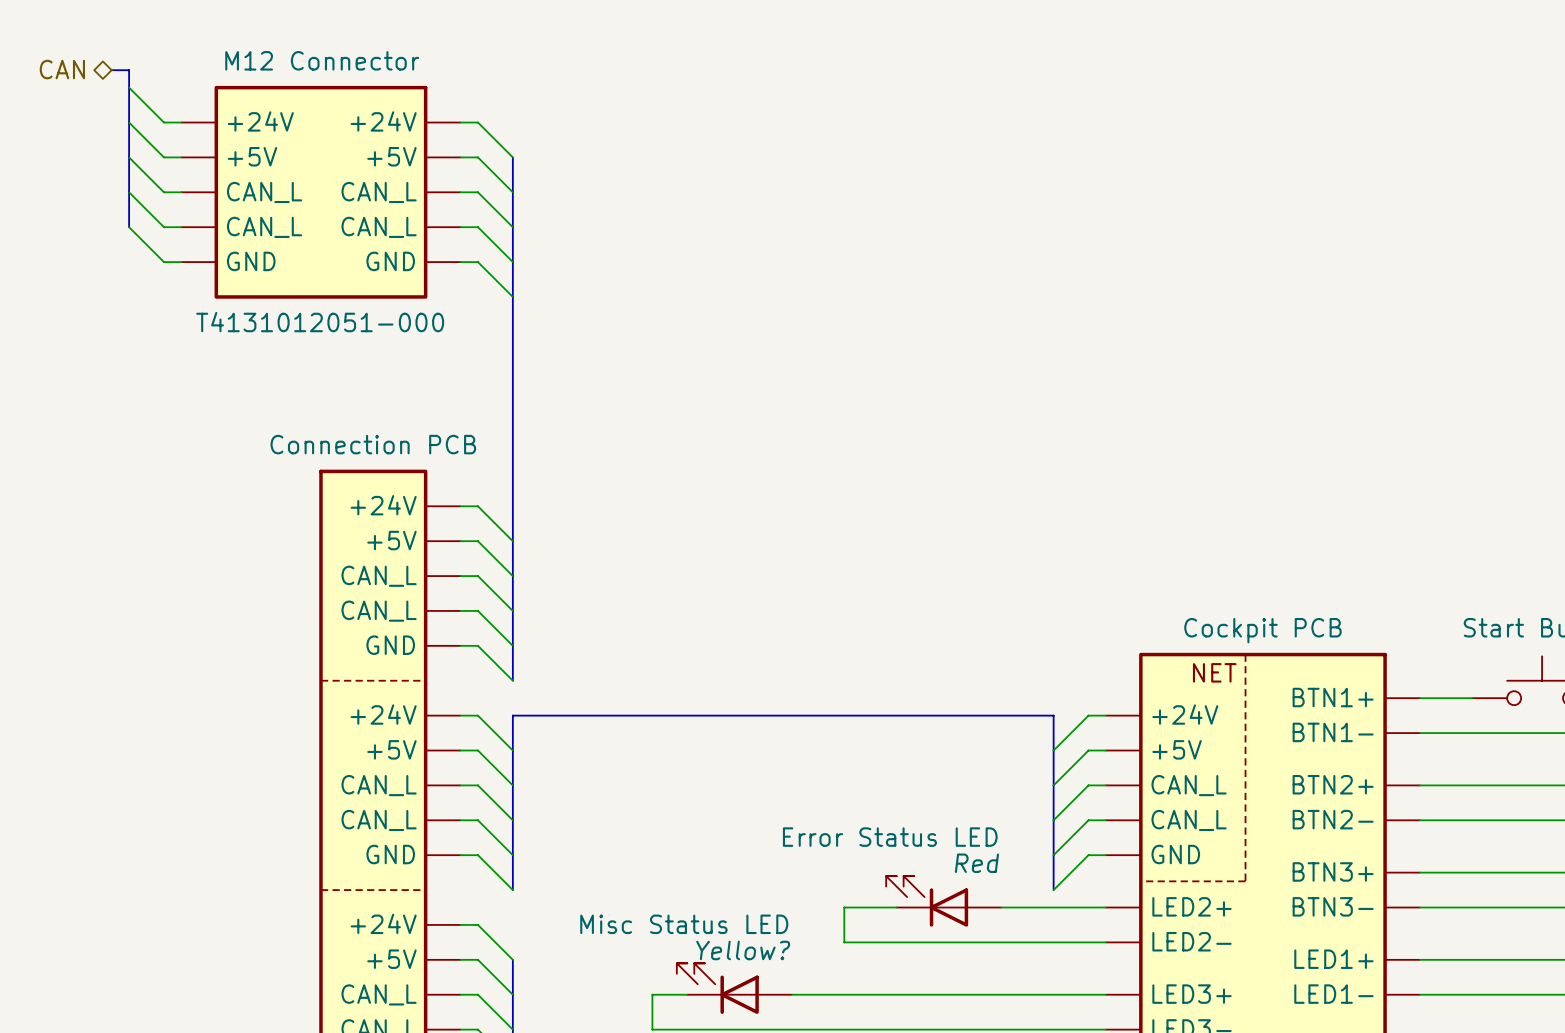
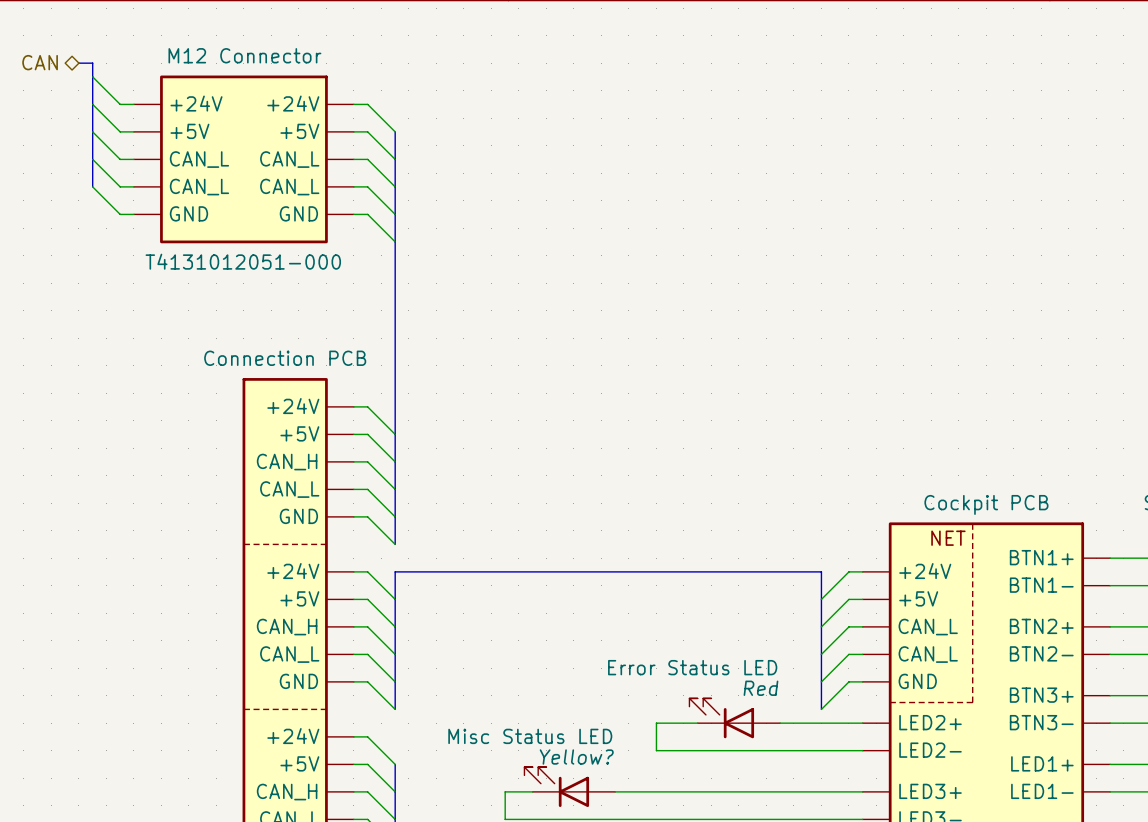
part pin name: CAN_L (379, 576) -> CAN_H (287, 462)
part pin name: CAN_L (379, 785) -> CAN_H (287, 627)
part pin name: CAN_L (379, 994) -> CAN_H (287, 792)

